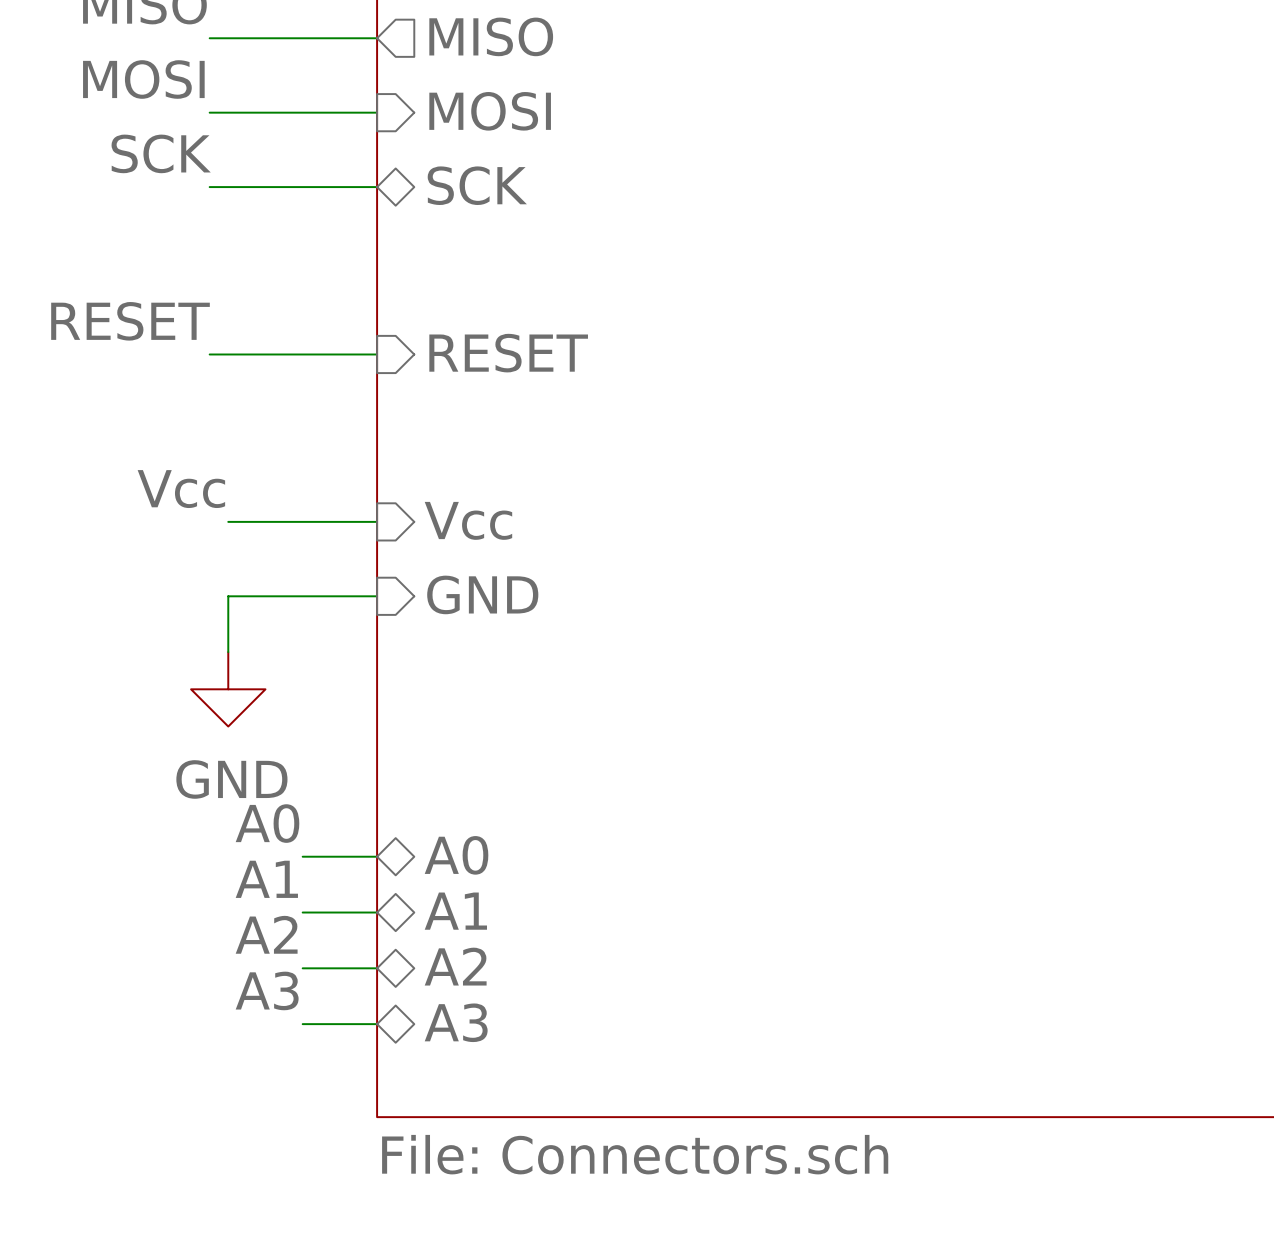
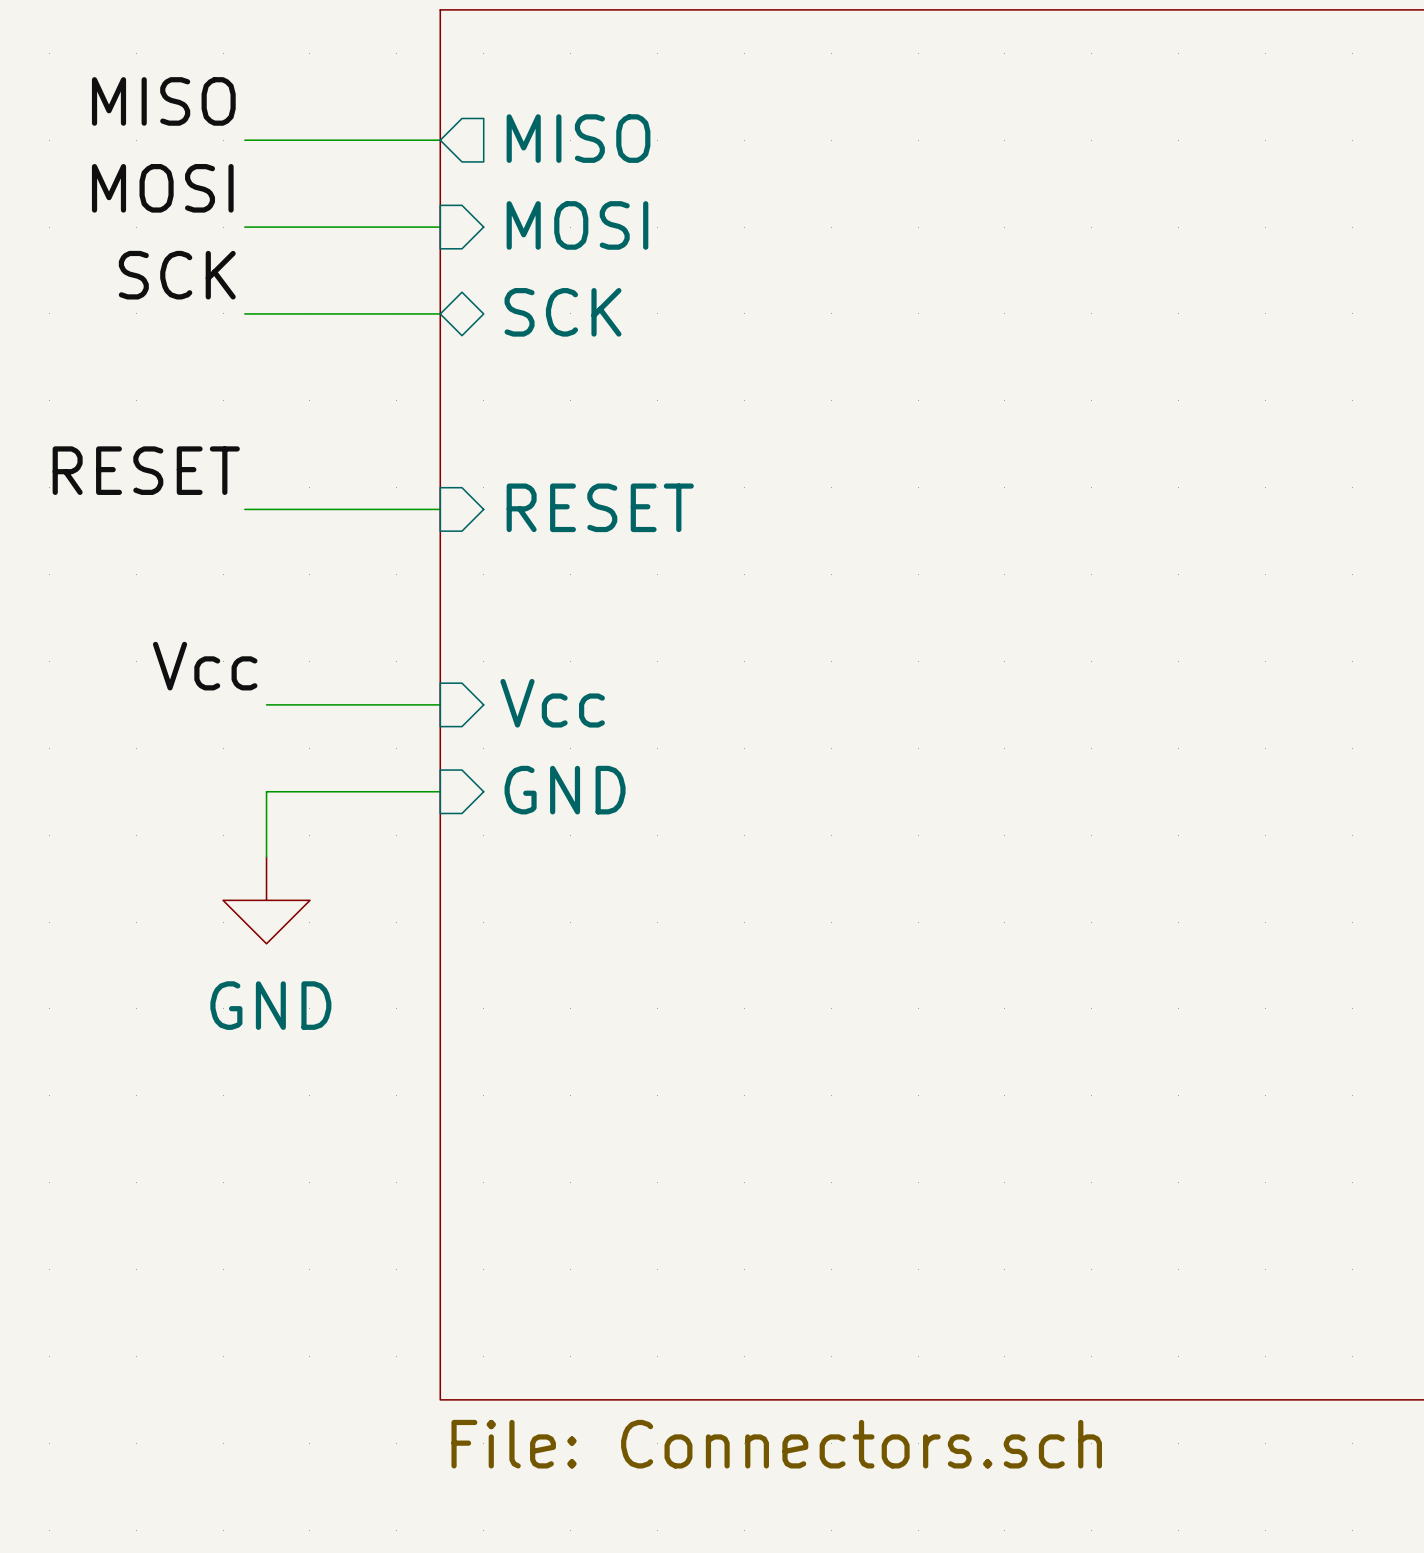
label: A0 (267, 823) -> none
sheet pin: A0 (456, 855) -> none
wire: (302, 856) (377, 856) -> none
label: A1 (266, 879) -> none
sheet pin: A1 (455, 911) -> none
wire: (302, 912) (377, 912) -> none
label: A2 (266, 934) -> none
sheet pin: A2 (455, 966) -> none
wire: (302, 968) (377, 968) -> none
label: A3 (267, 990) -> none
sheet pin: A3 (456, 1022) -> none
wire: (302, 1024) (377, 1024) -> none

